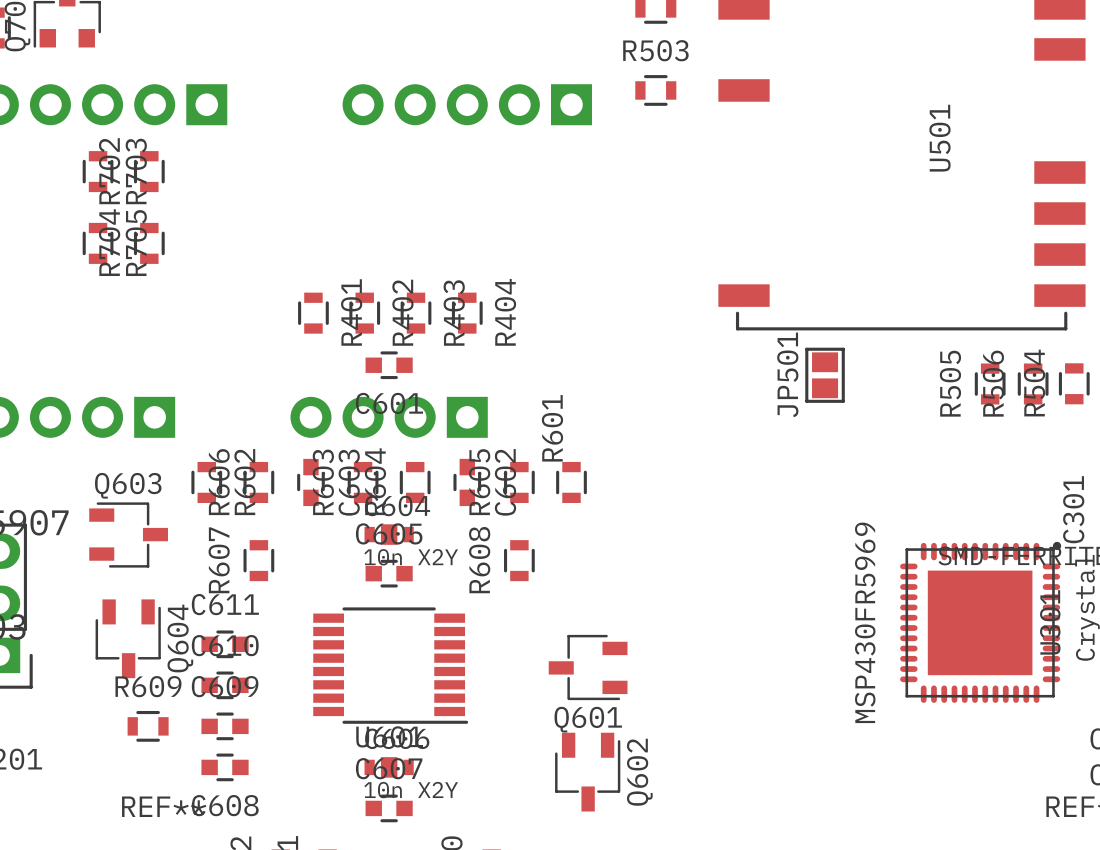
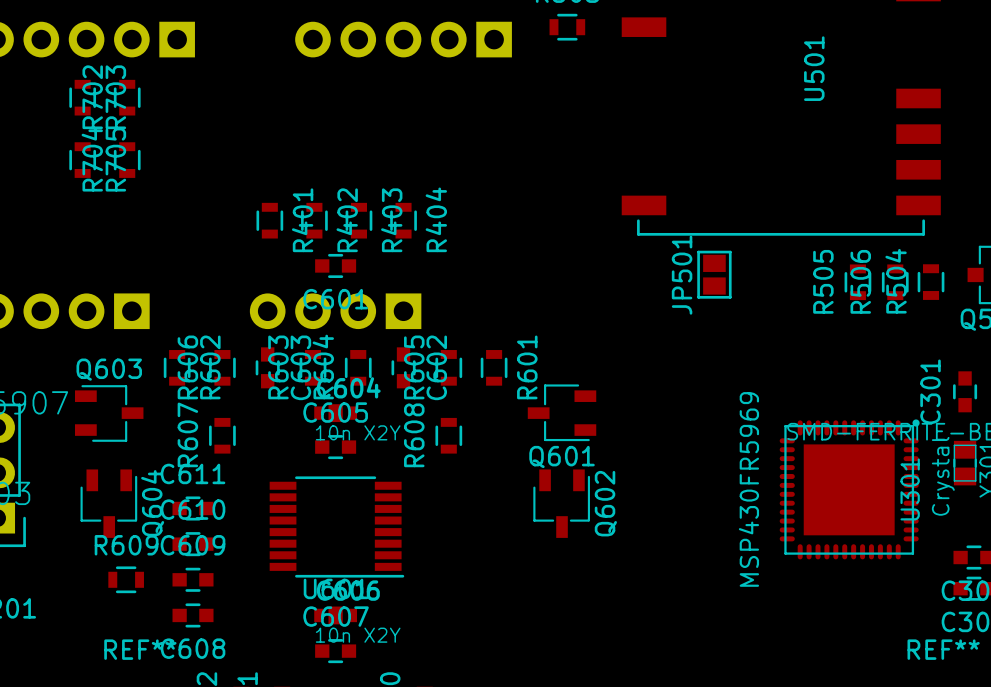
R601 name position: R601 (552, 428) -> R601 (527, 367)
Q601 position: (588, 667) -> (562, 412)
Q602 position: (587, 772) -> (561, 503)

